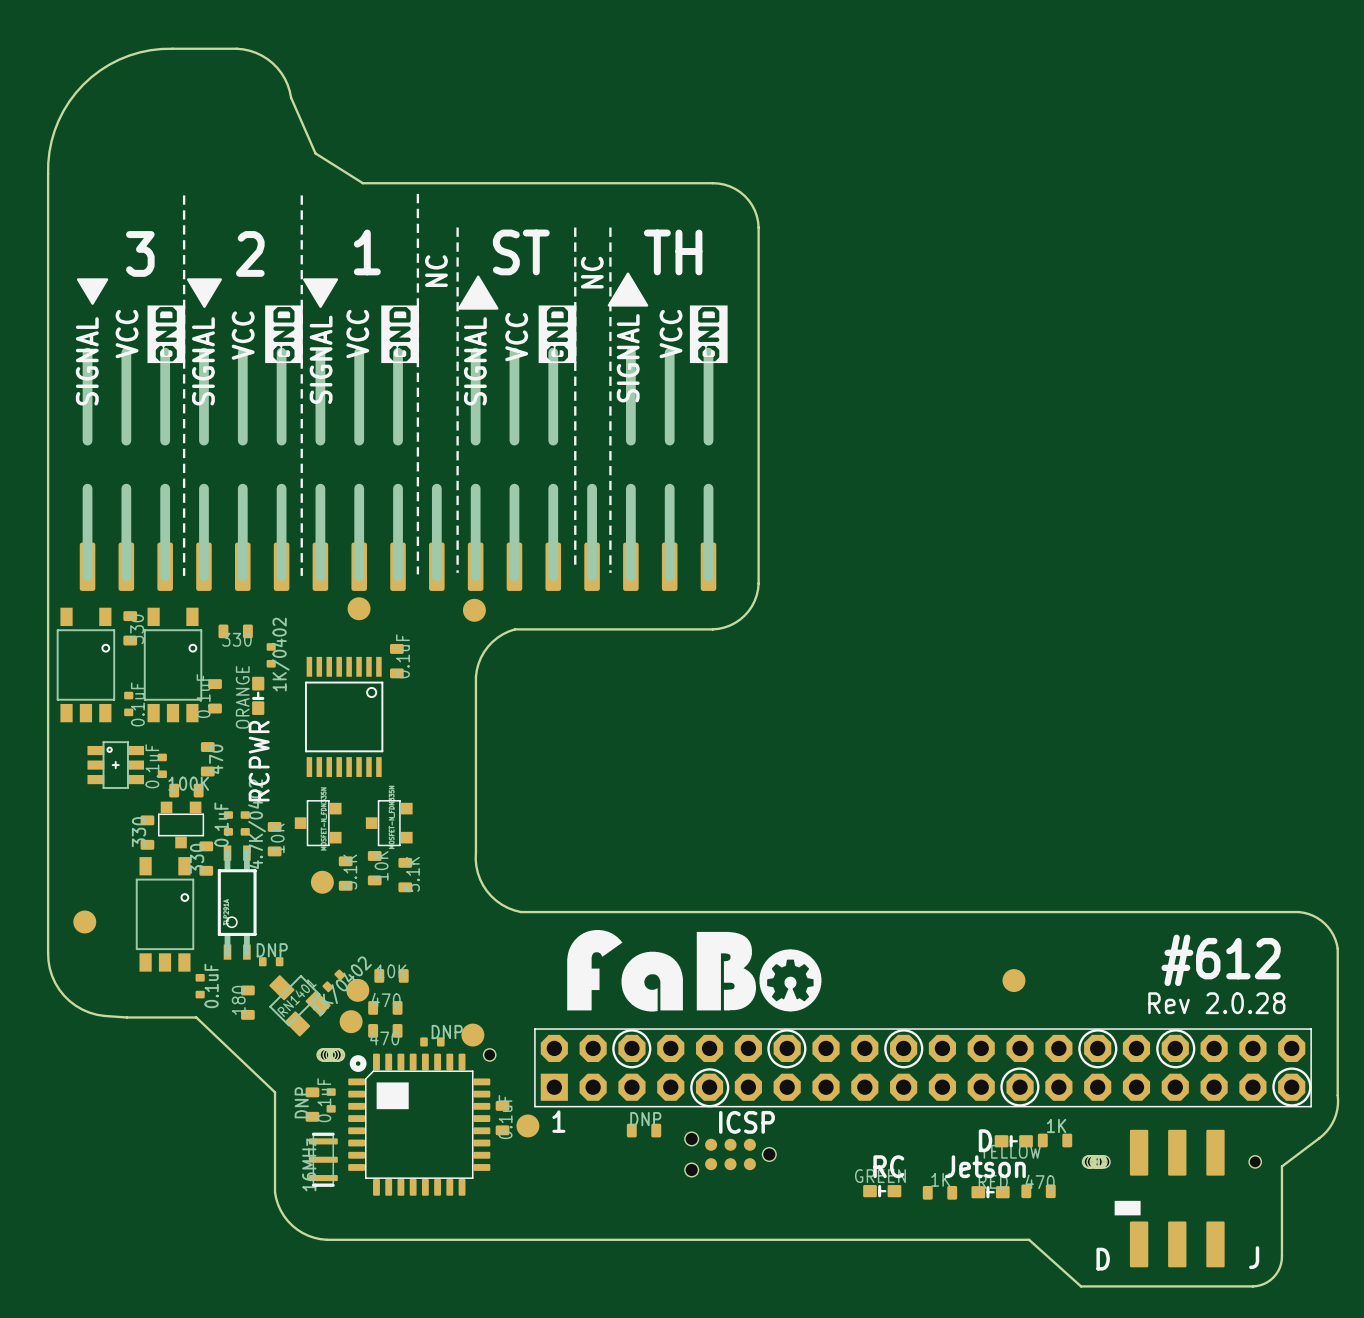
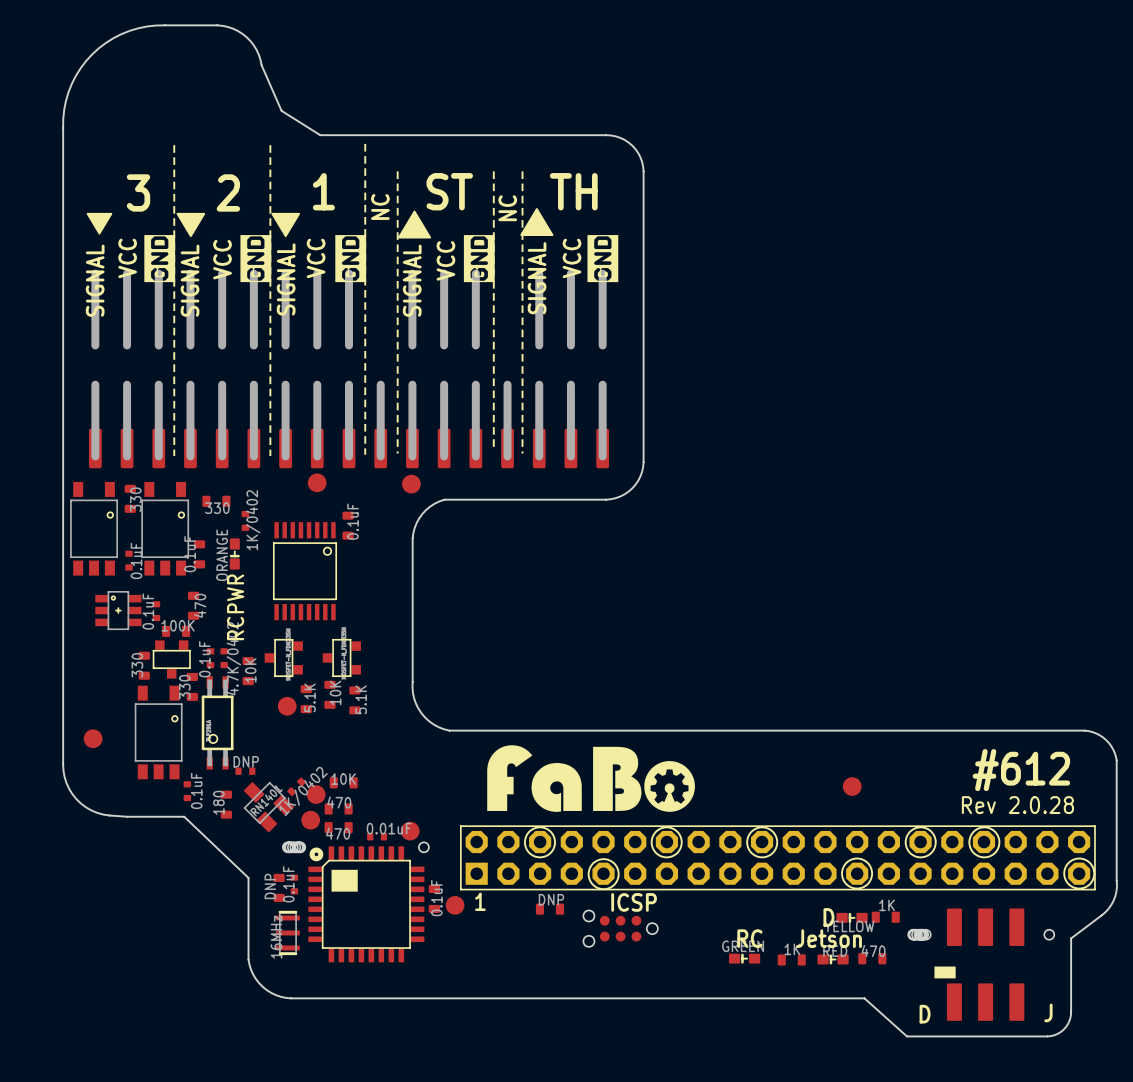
part value: DNP (447, 1032) -> 0.01uF (389, 828)

